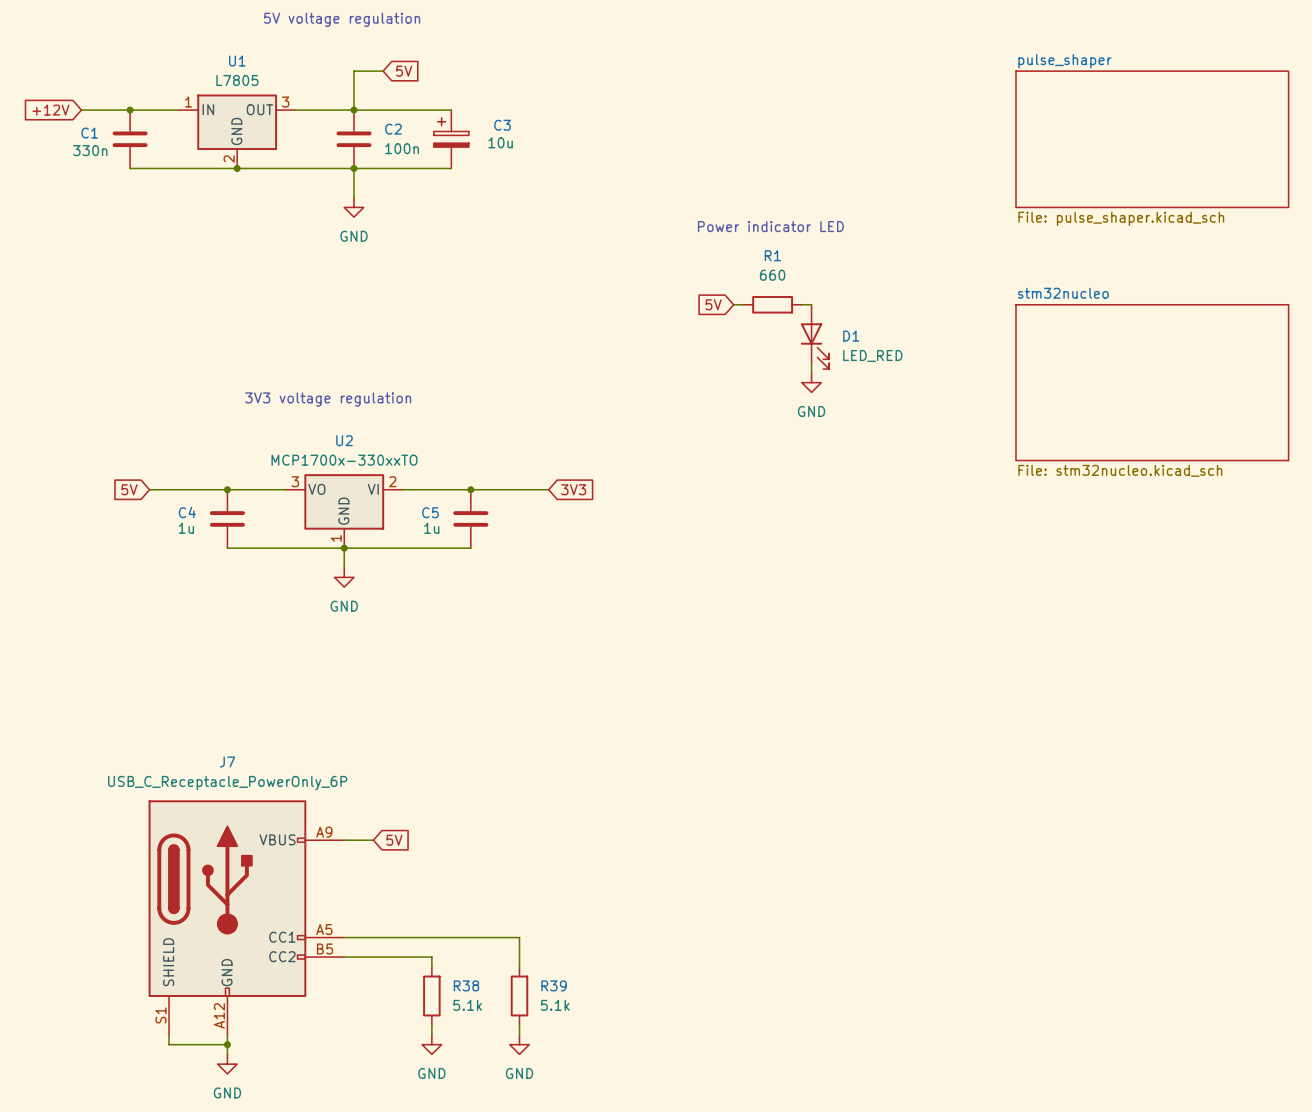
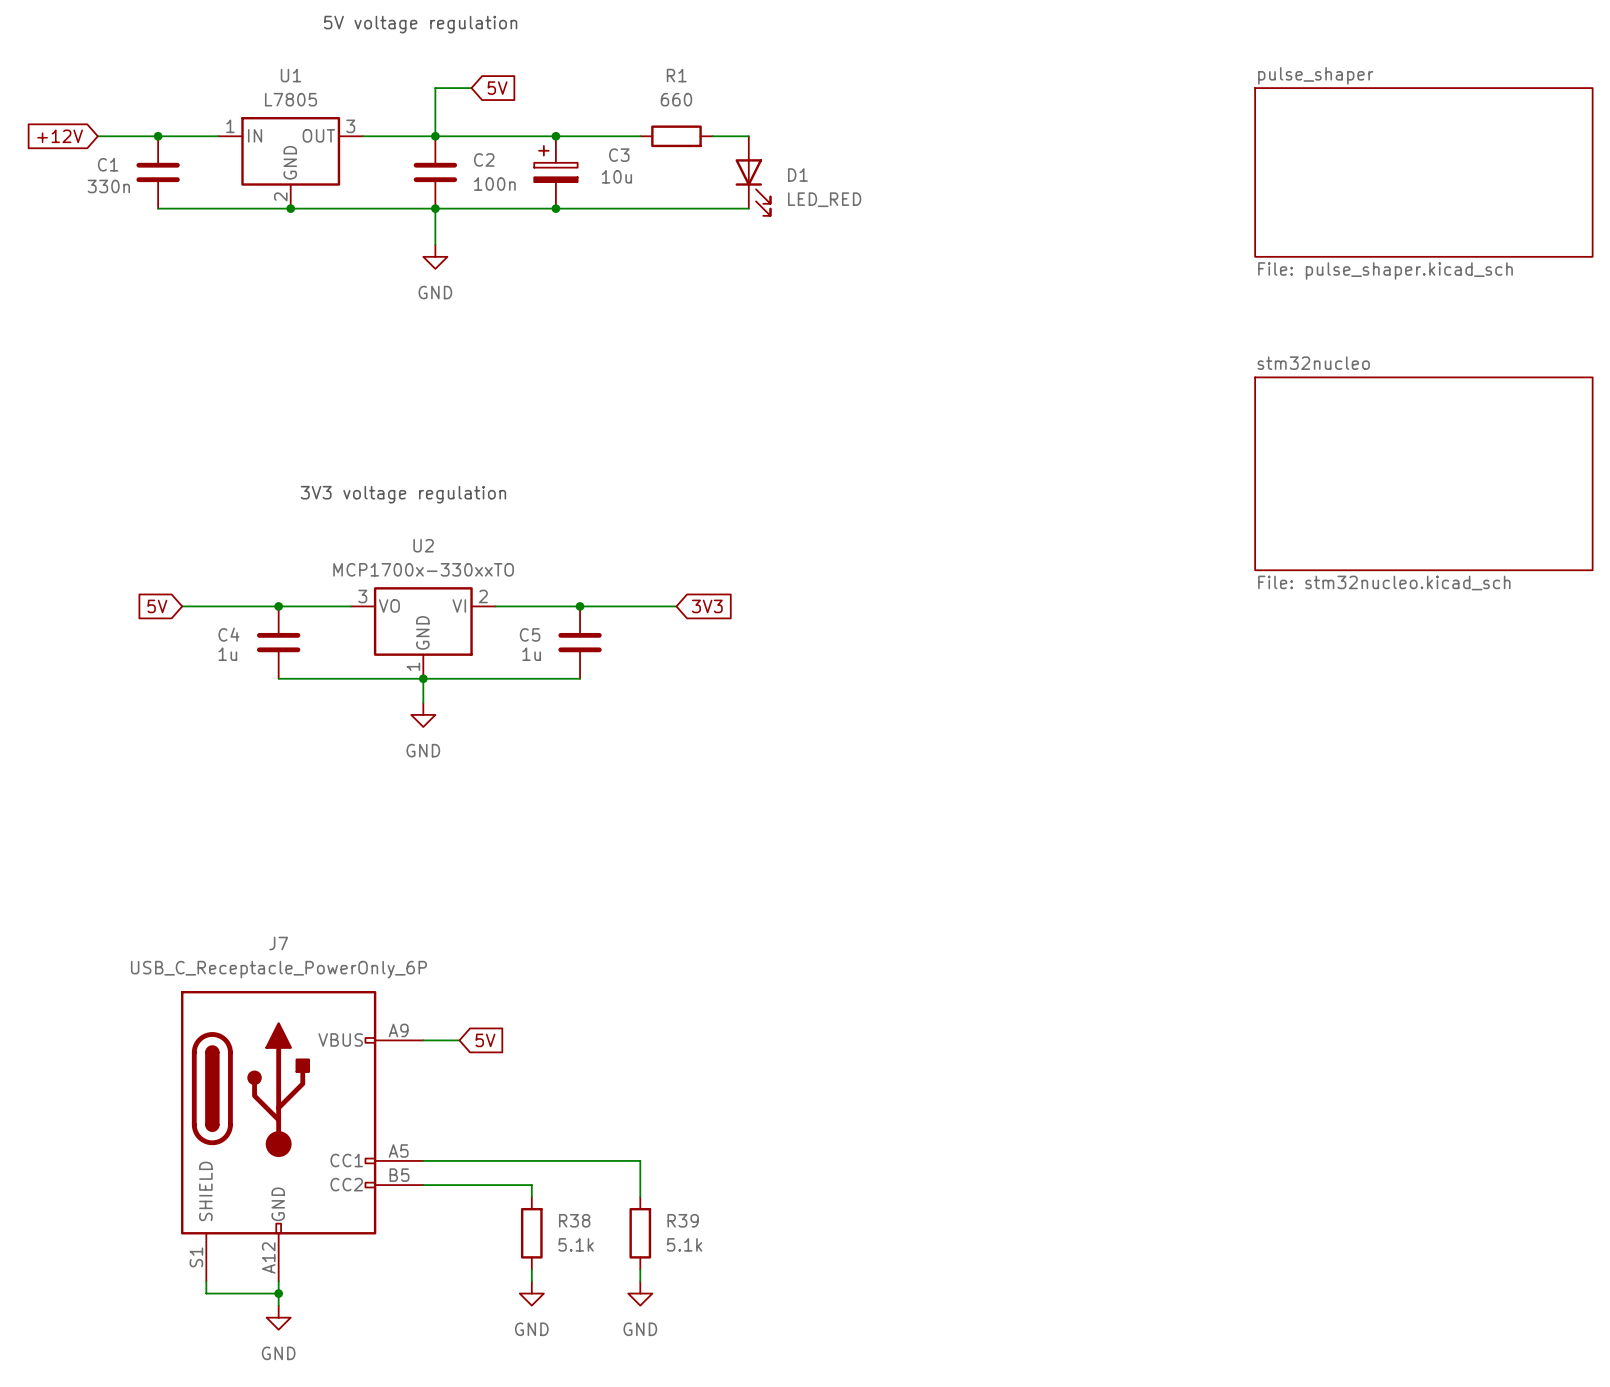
wire: none -> (555, 136) (640, 136)
junction: none -> (555, 136)
wire: none -> (712, 136) (748, 136)
wire: none -> (555, 208) (748, 208)
junction: none -> (555, 208)
text: Power indicator LED (770, 226) -> none
global label: 5V (713, 304) -> none
wire: (733, 304) (743, 304) -> none
R1 position: (772, 304) -> (676, 136)
wire: (801, 304) (811, 304) -> none
D1 position: (814, 336) -> (753, 176)
wire: (811, 363) (811, 372) -> none
power symbol: GND (811, 382) -> none

